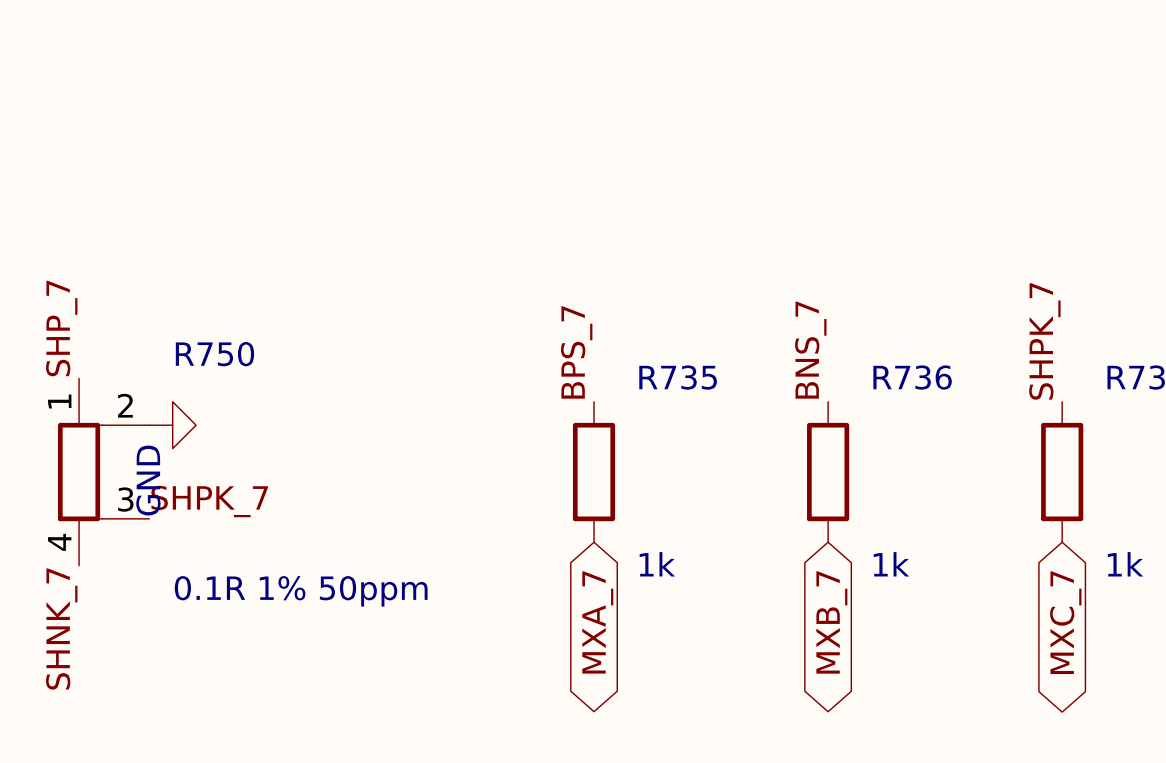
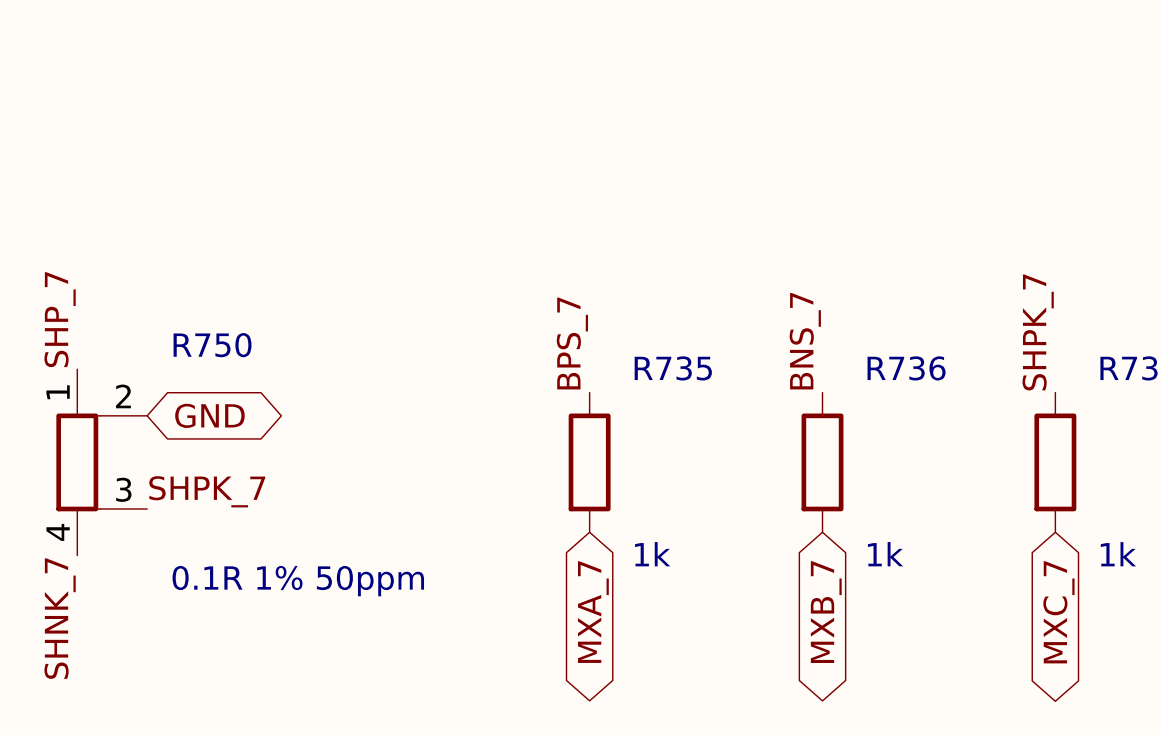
power symbol: GND (172, 425) -> none
global label: none -> GND (209, 415)

